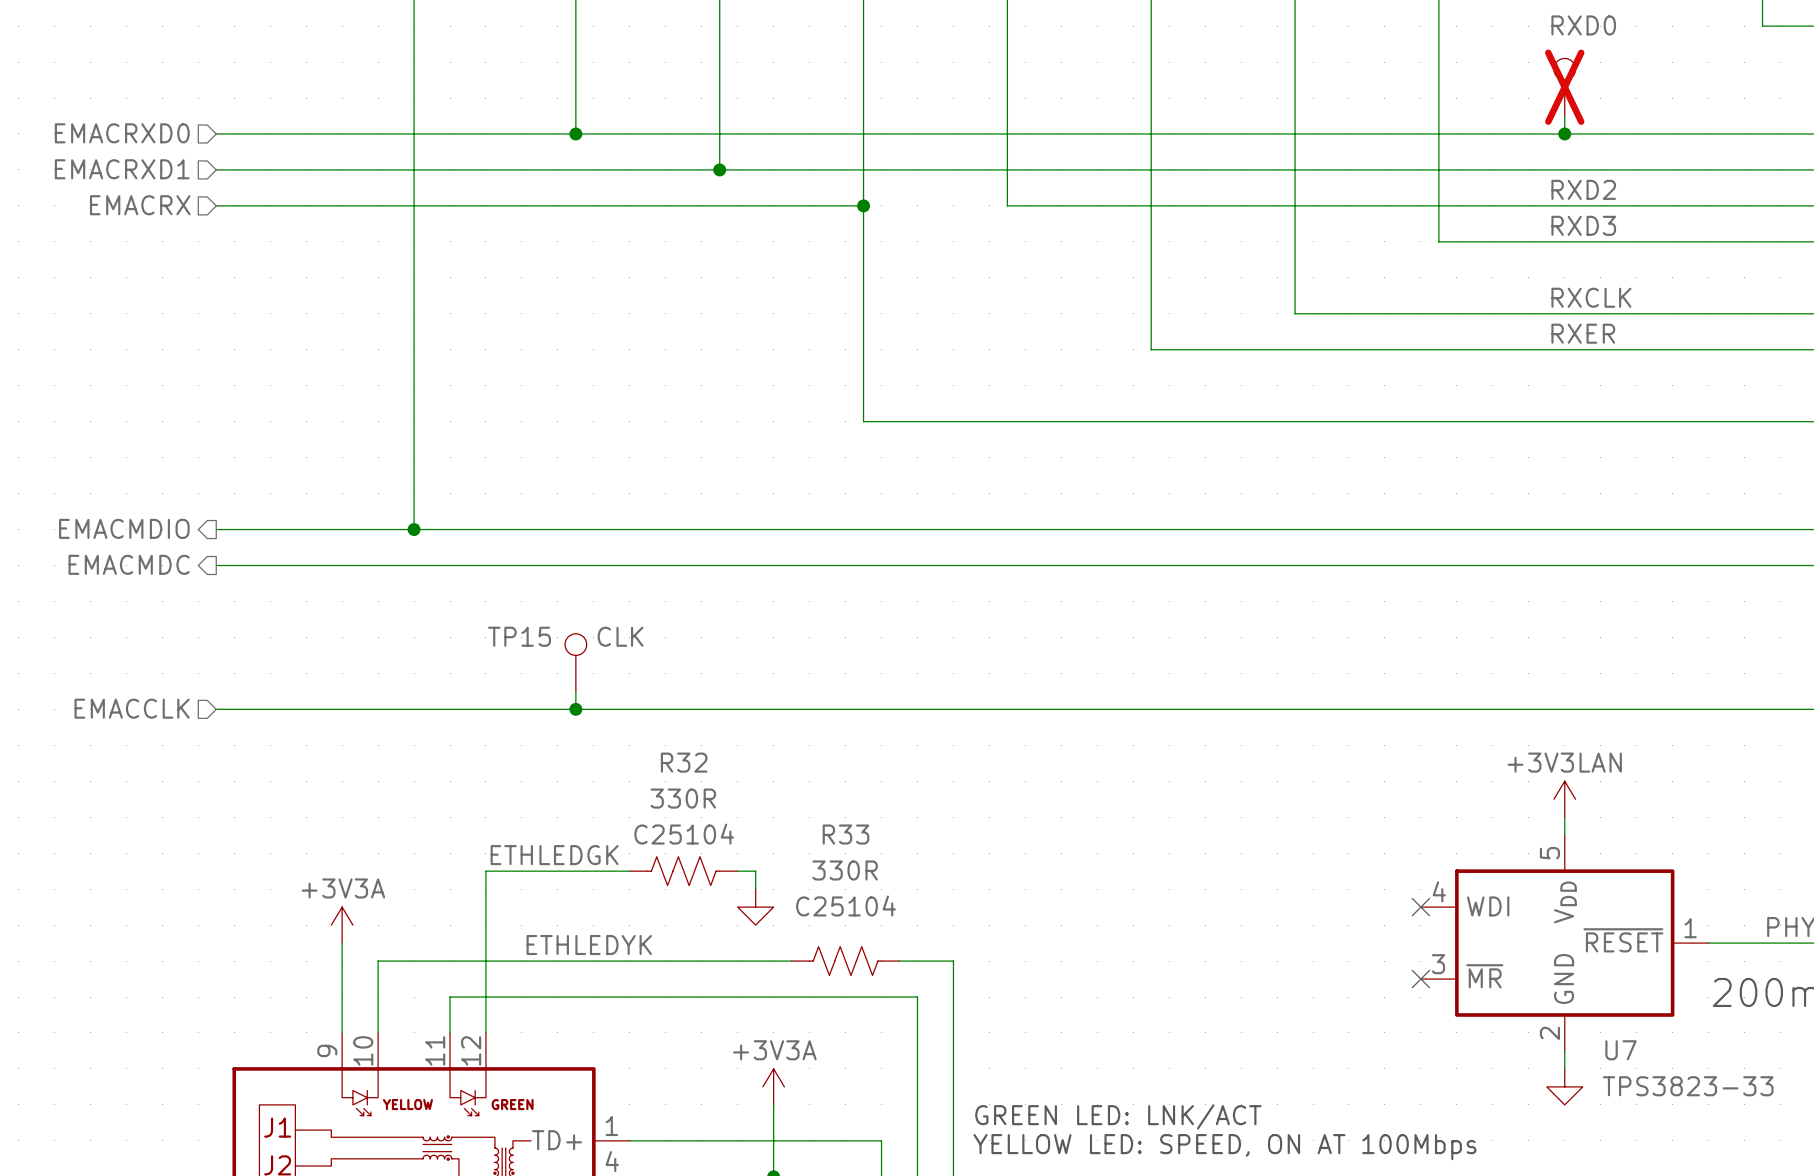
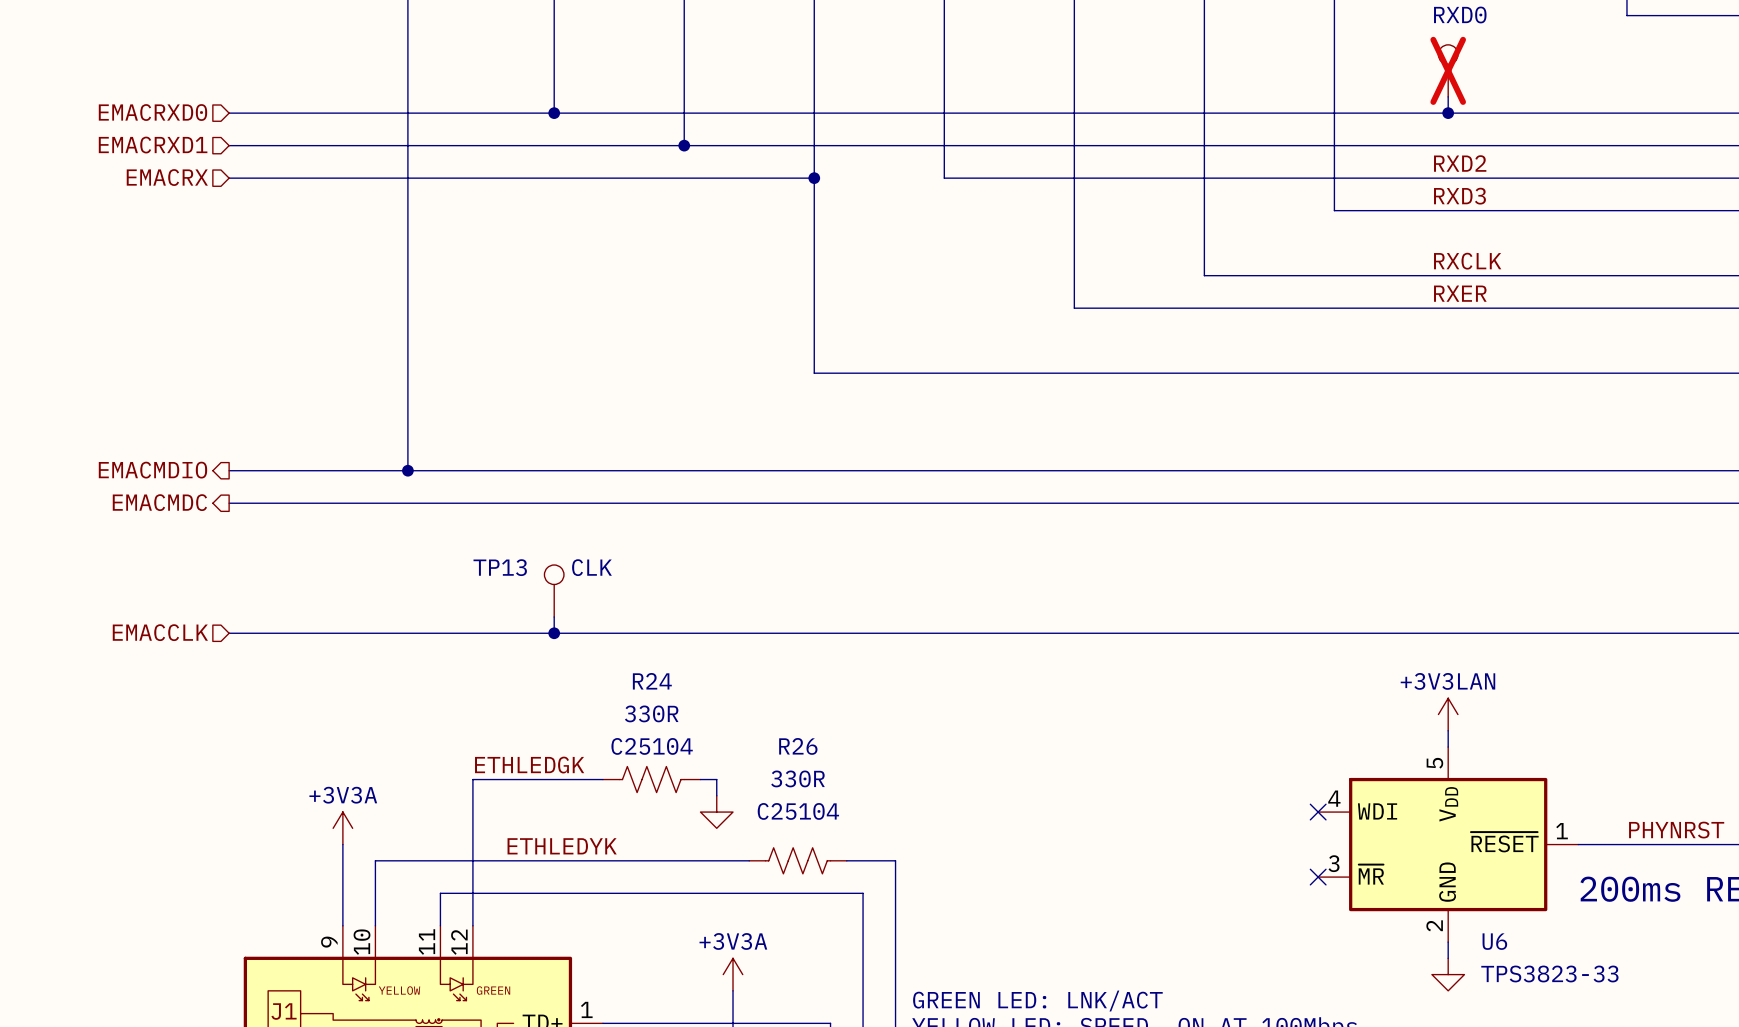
TP15 name: TP15 (519, 636) -> TP13 (500, 567)
R32 name: R32 (684, 762) -> R24 (652, 681)
R33 name: R33 (845, 834) -> R26 (798, 746)
U7 name: U7 (1620, 1050) -> U6 (1494, 941)

